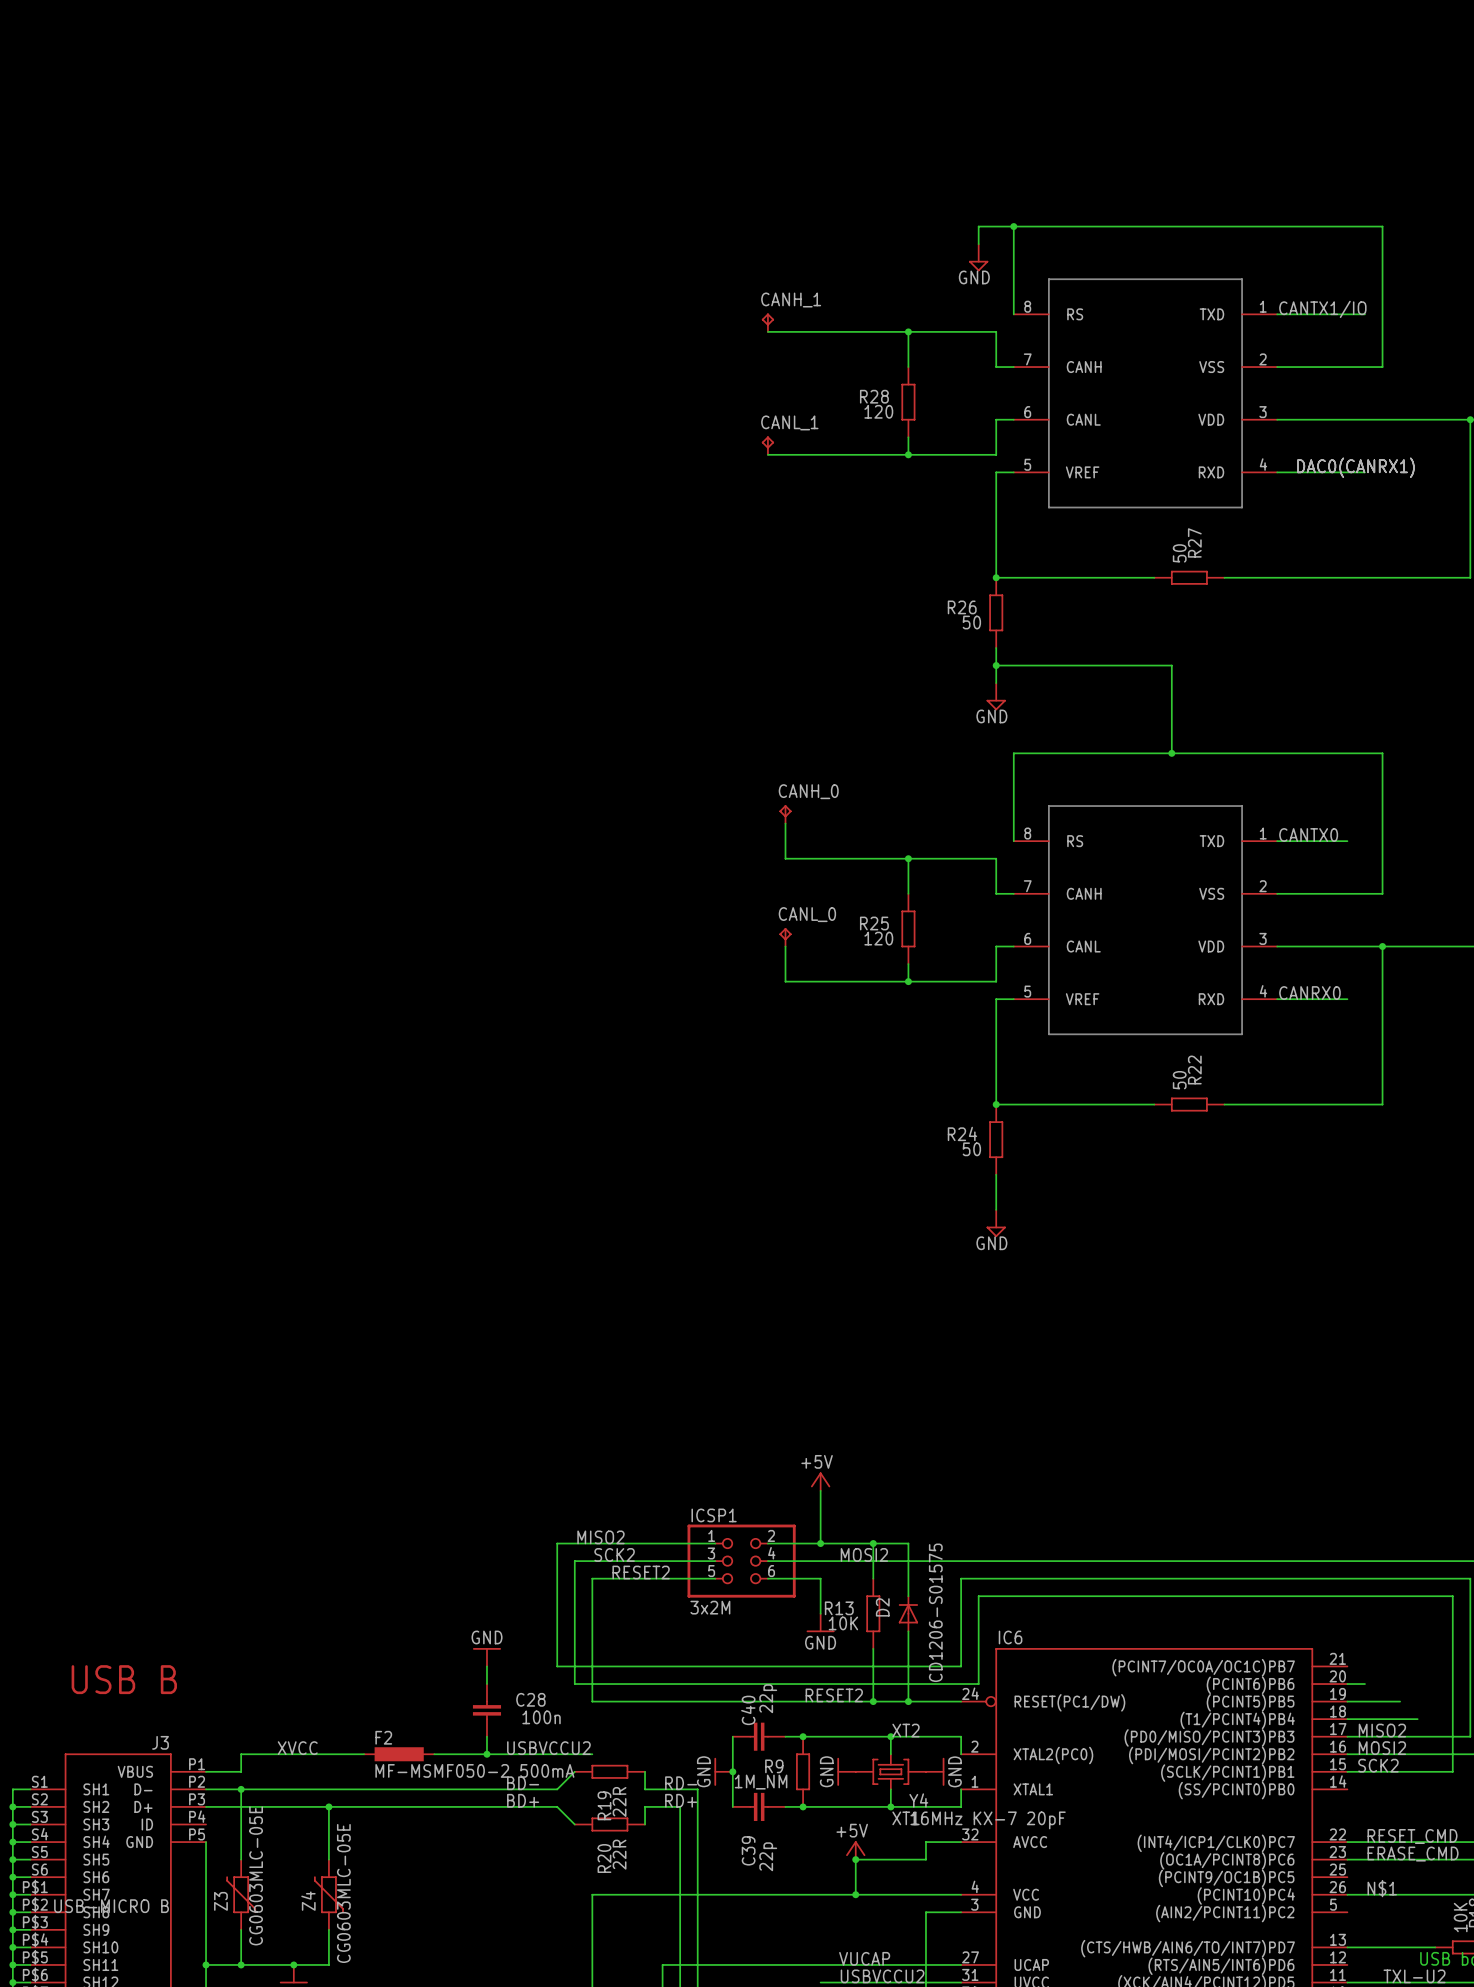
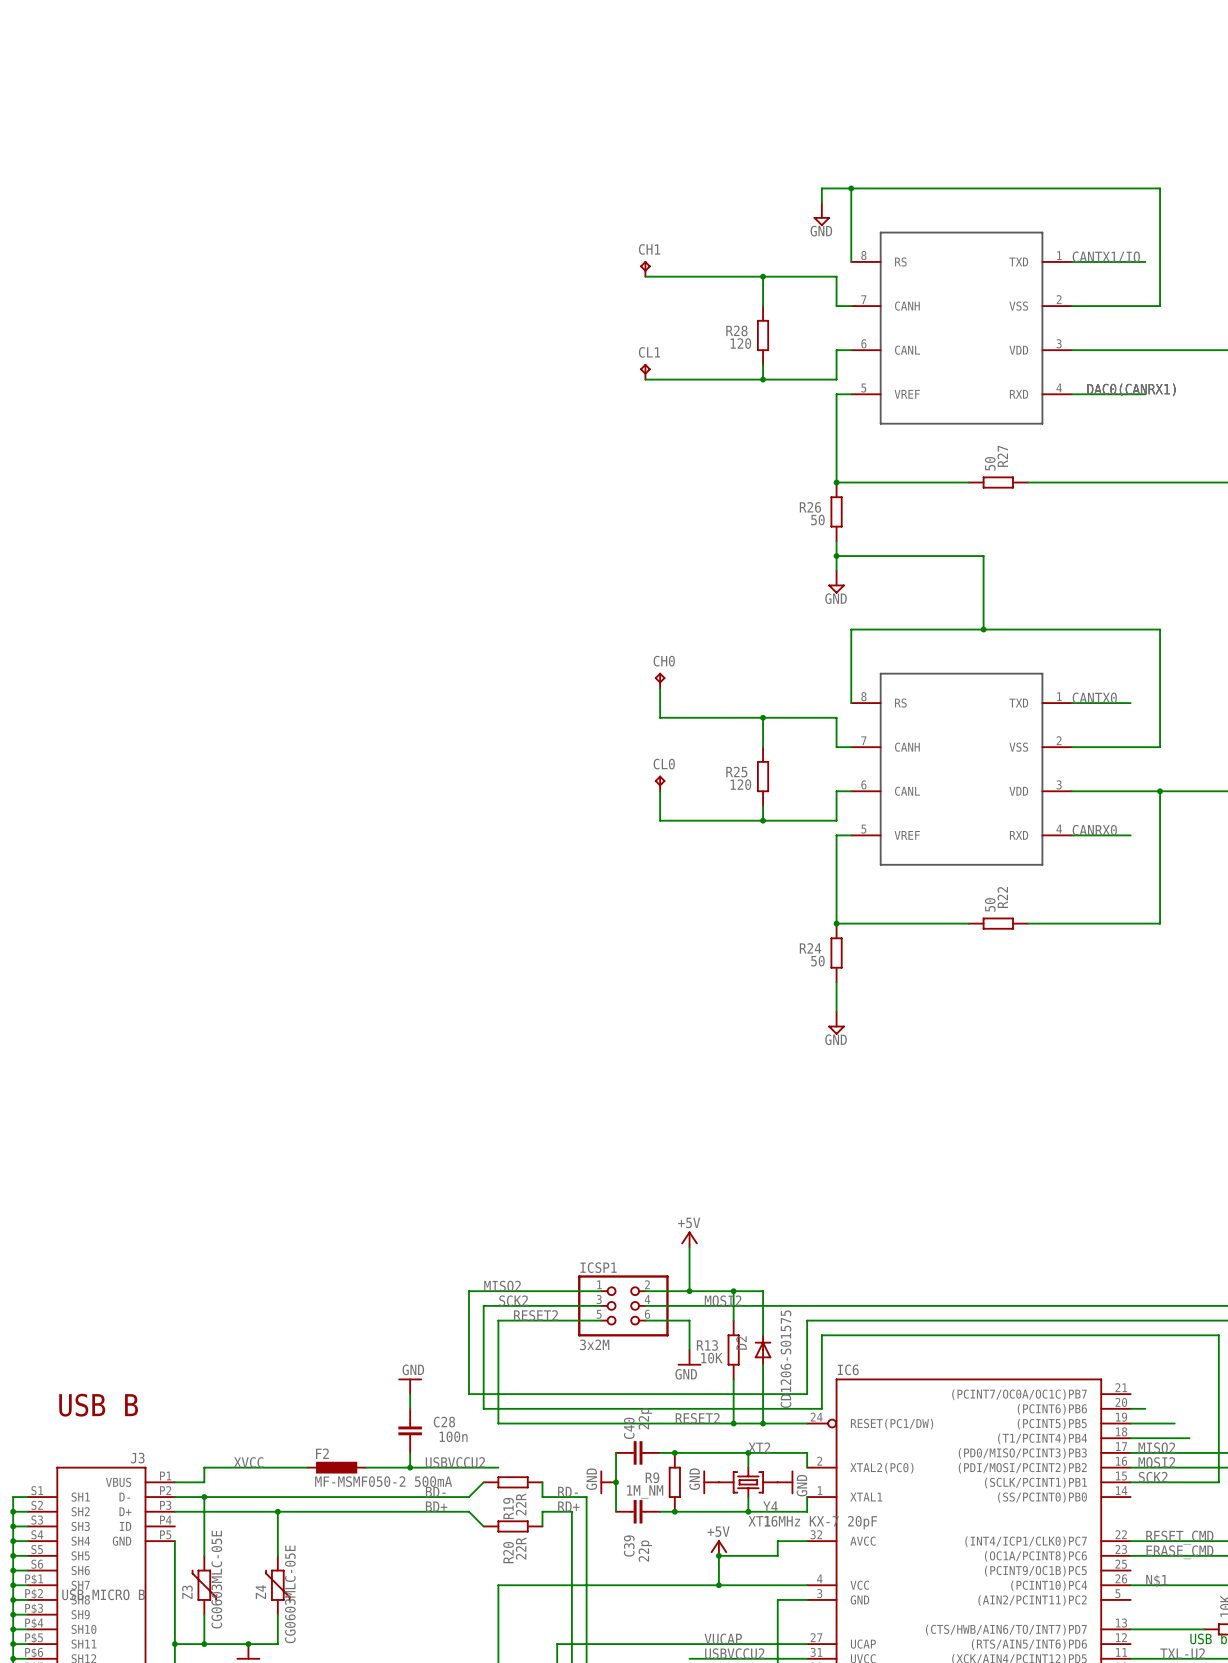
CANH_1 name: CANH_1 (791, 300) -> CH1 (649, 249)
CANL_1 name: CANL_1 (789, 422) -> CL1 (649, 352)
CANH_0 name: CANH_0 (808, 791) -> CH0 (664, 661)
CANL_0 name: CANL_0 (807, 914) -> CL0 (664, 764)

